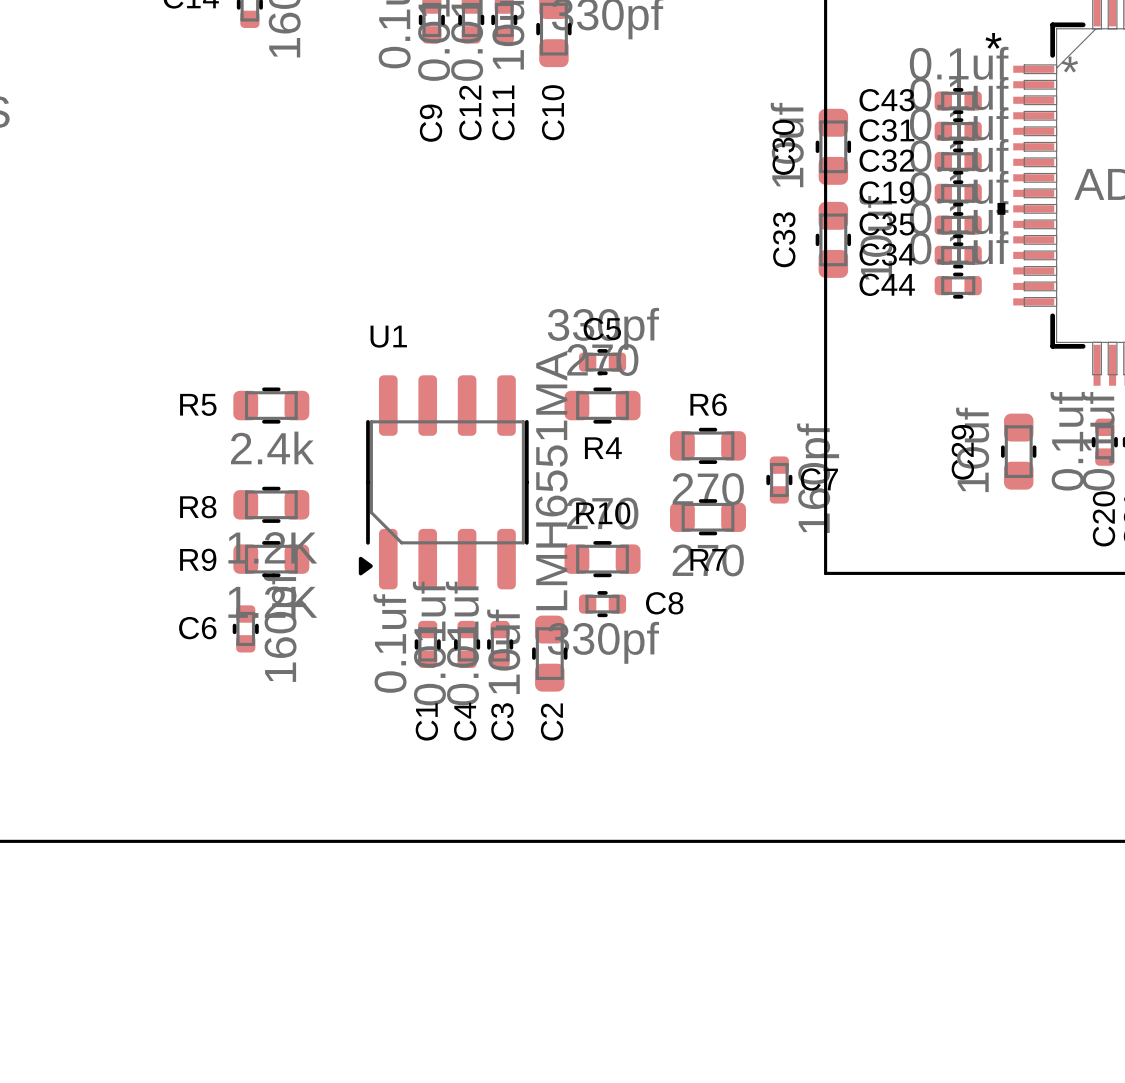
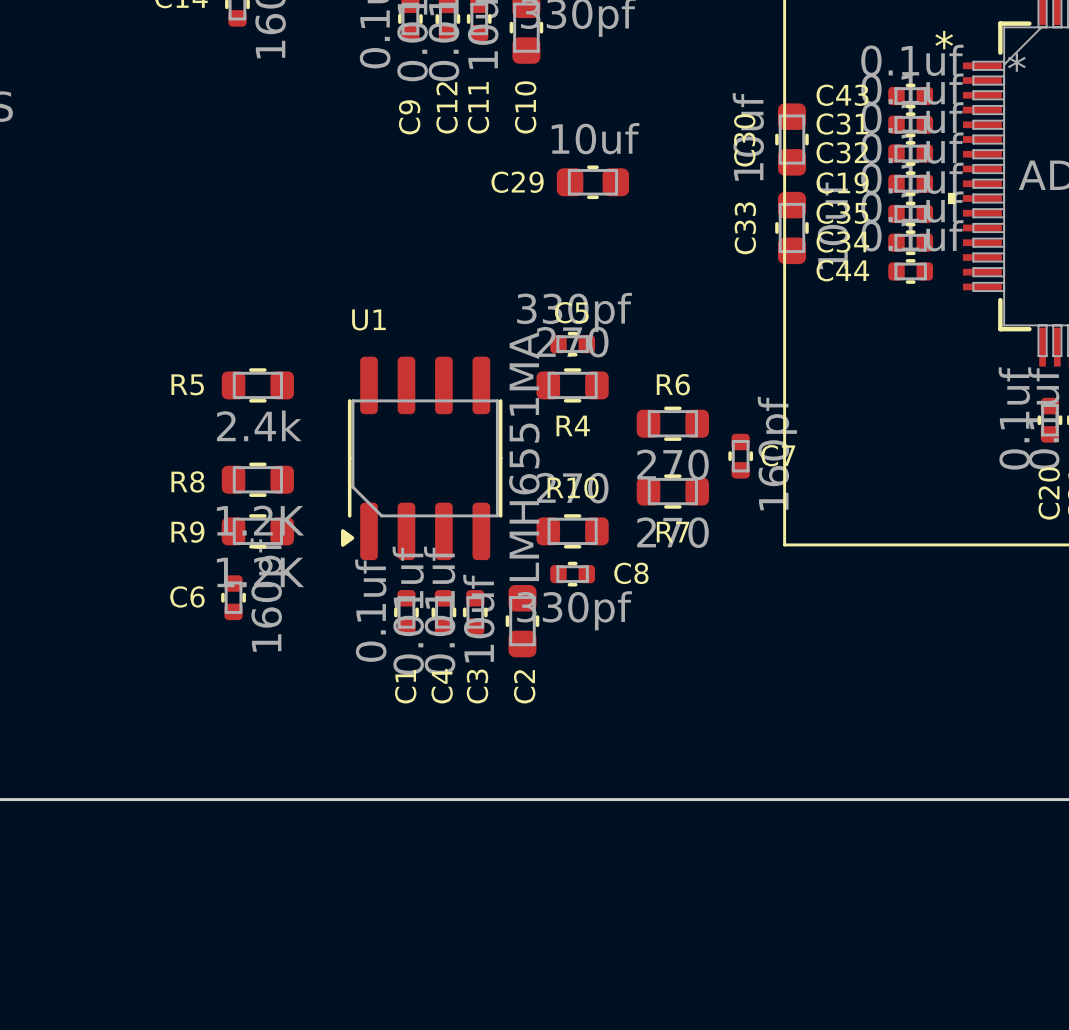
C29 rotation: 0° (1018, 451) -> 90° clockwise (592, 182)
C29 position: (1018, 451) -> (592, 182)

